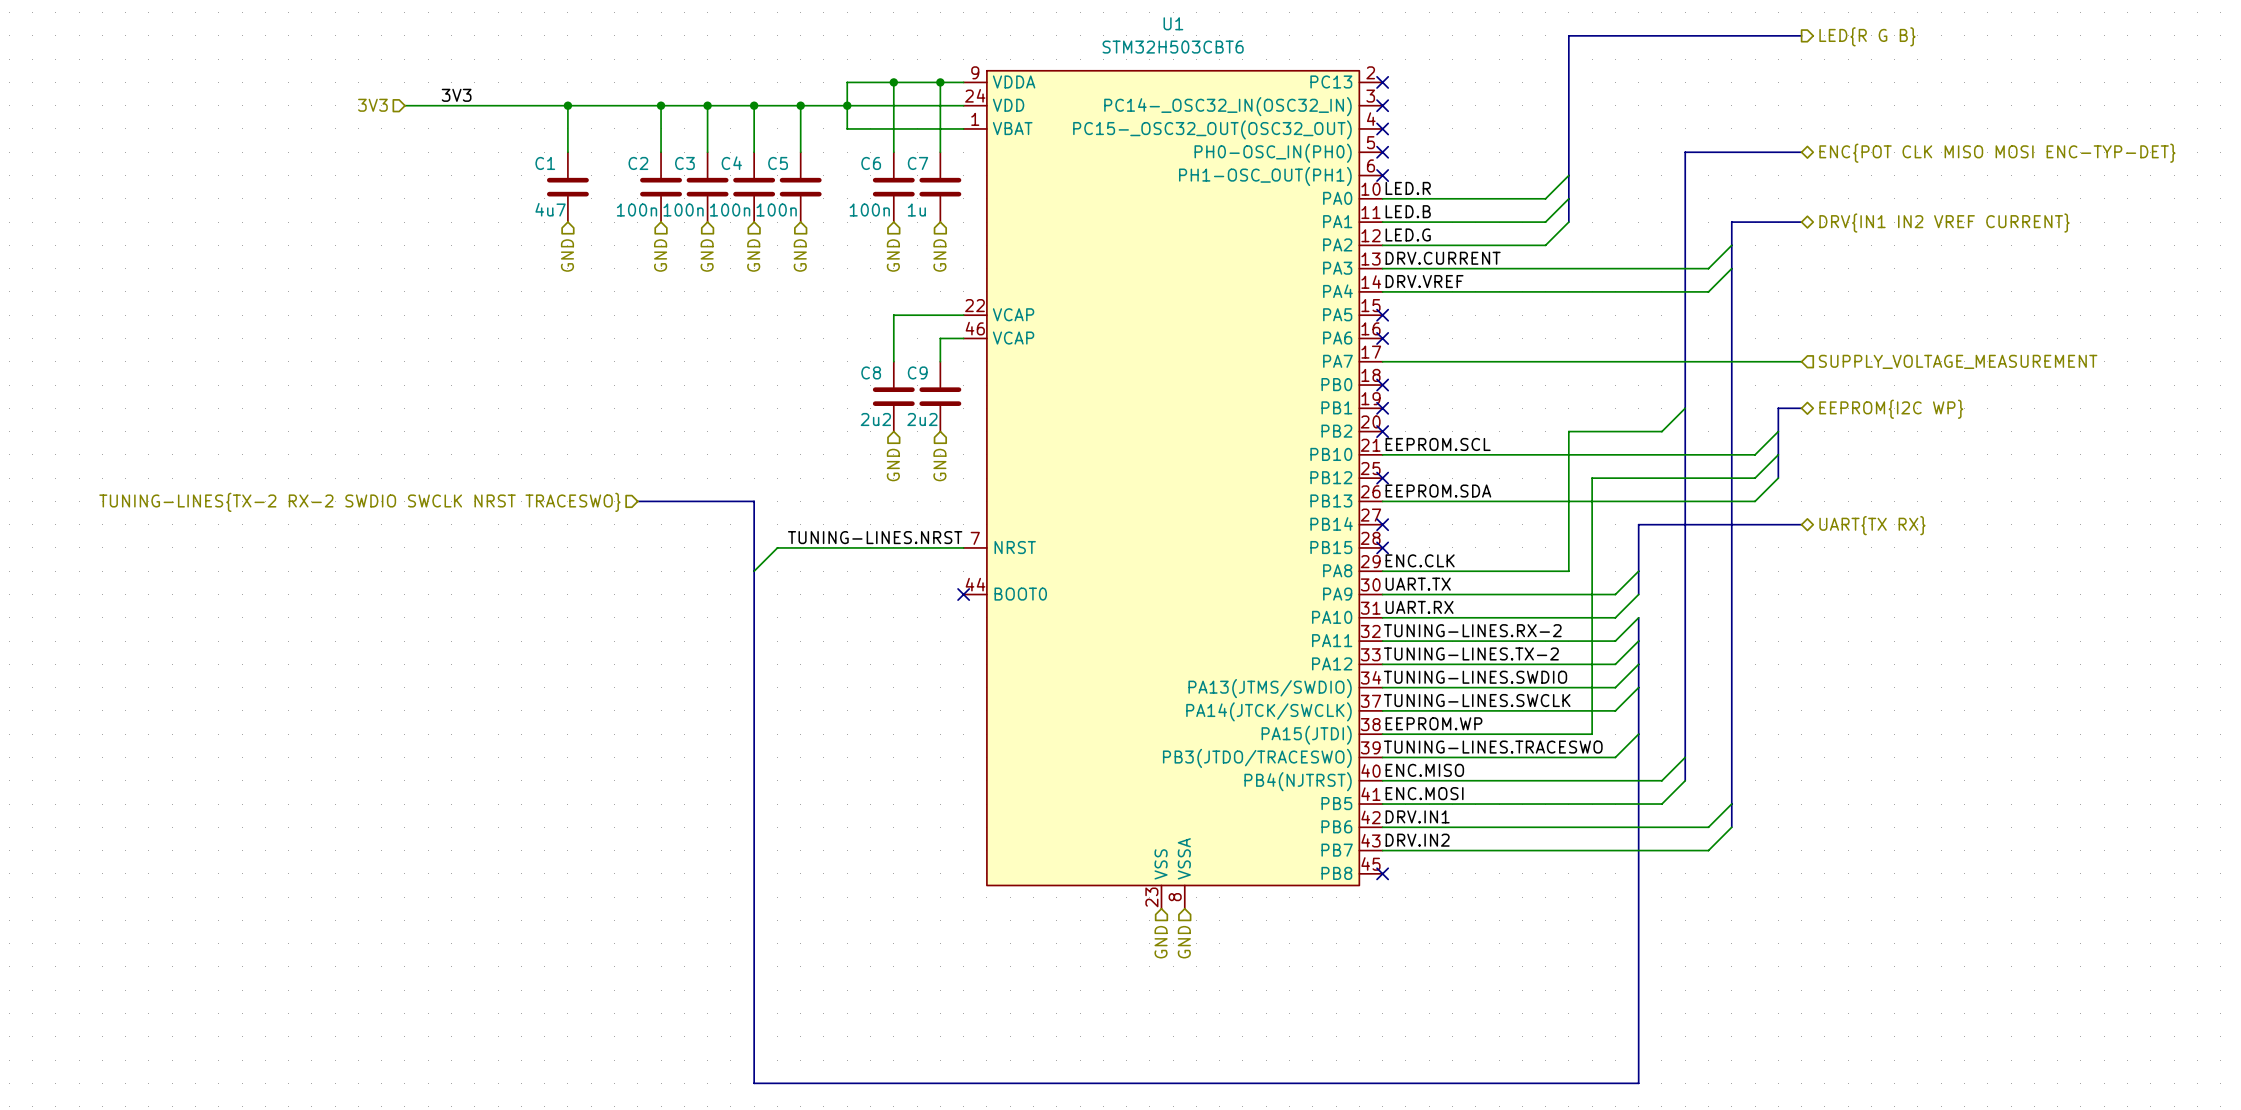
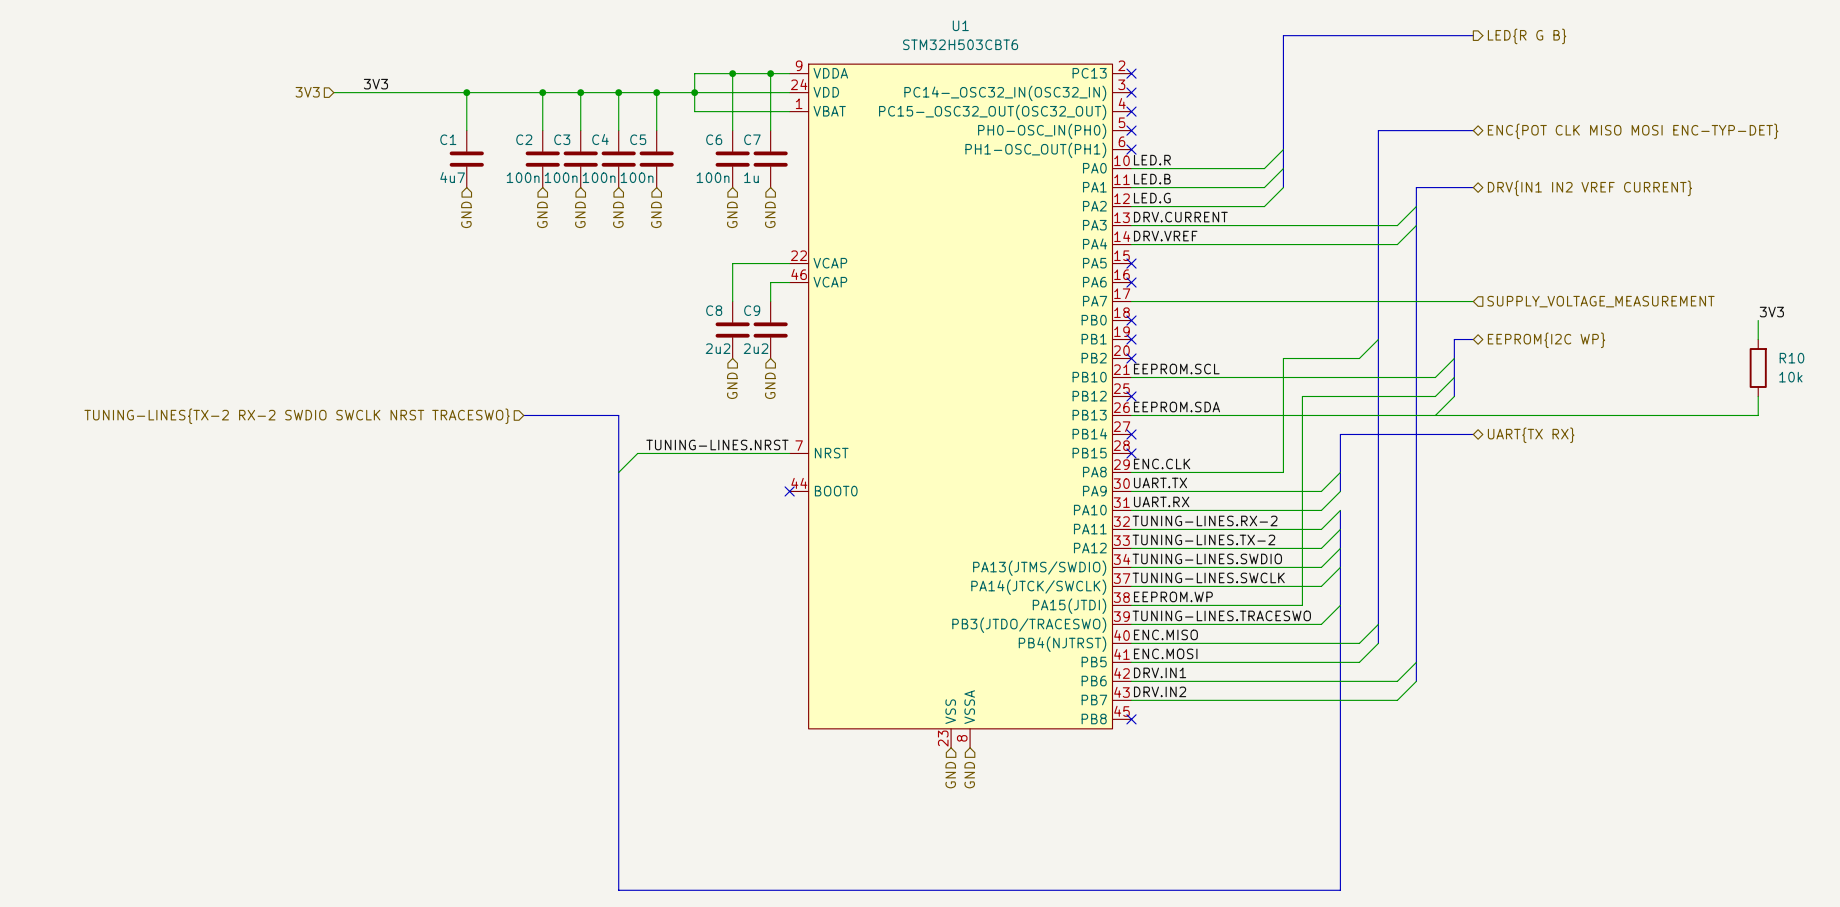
label: none -> 3V3 (1771, 312)
wire: none -> (1758, 320) (1758, 339)
R10: none -> 10k (1758, 368)
wire: none -> (1758, 396) (1758, 415) (1435, 415)

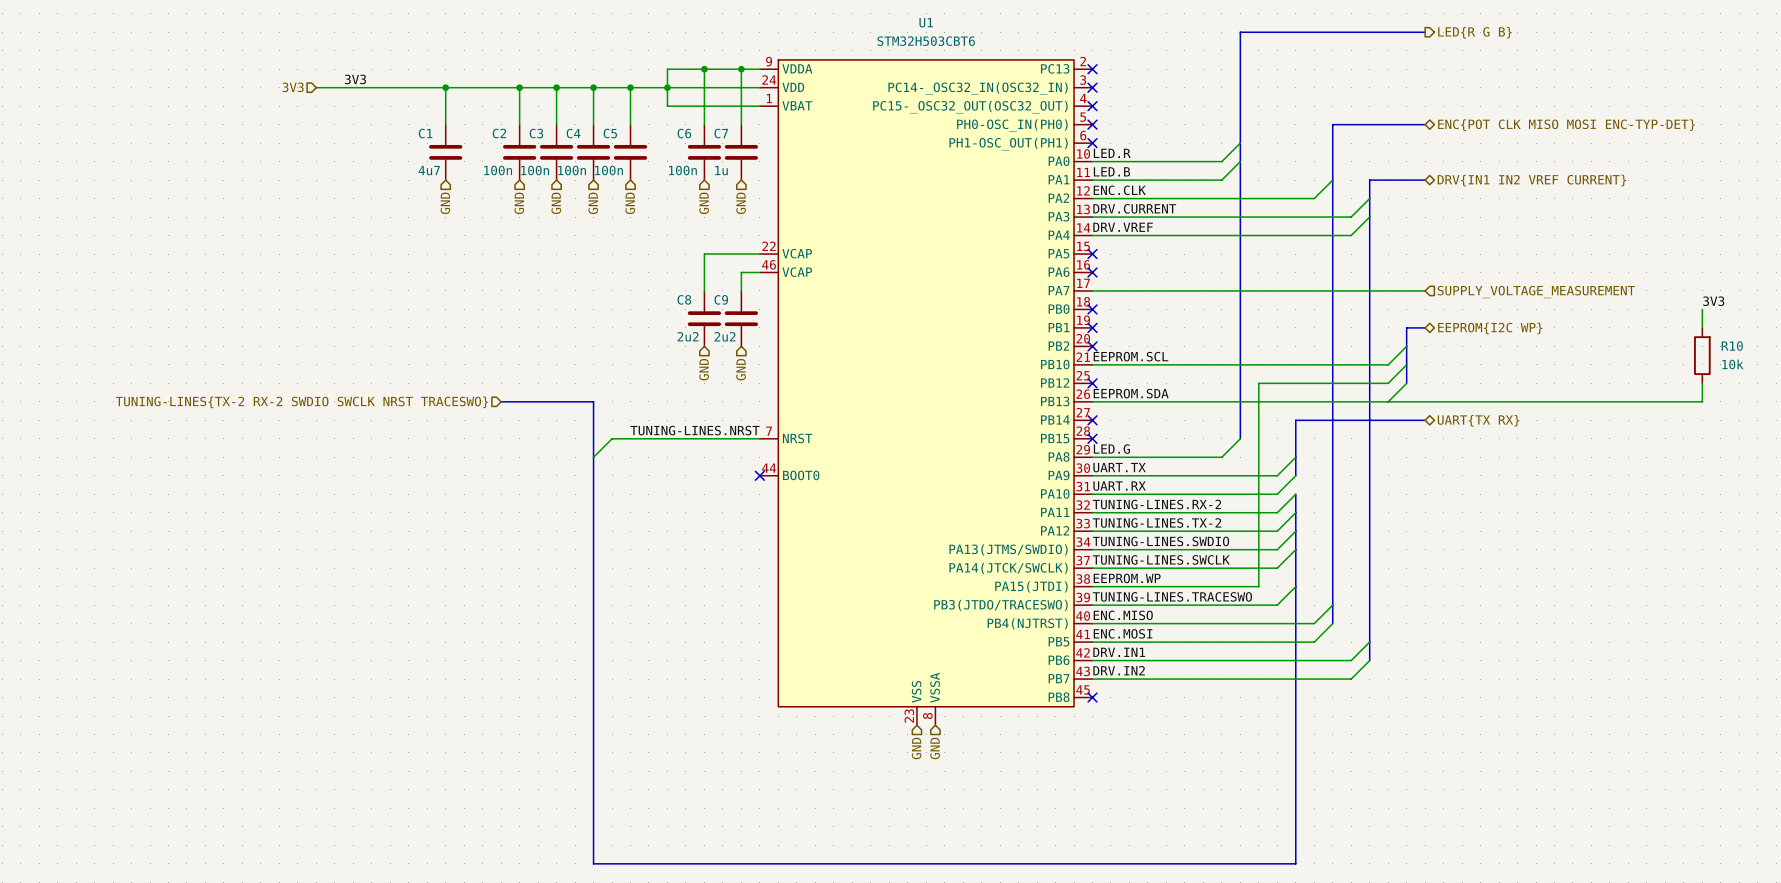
wire: (1283, 187) (1264, 206) -> (1332, 180) (1314, 198) (1221, 198)
bus: none -> (1240, 180) (1240, 438)
label: LED.G (1152, 198) -> ENC.CLK (1119, 190)
wire: (1378, 339) (1359, 358) (1283, 358) (1283, 472) (1264, 472) -> (1240, 438) (1221, 457)
label: ENC.CLK (1162, 463) -> LED.G (1111, 449)

